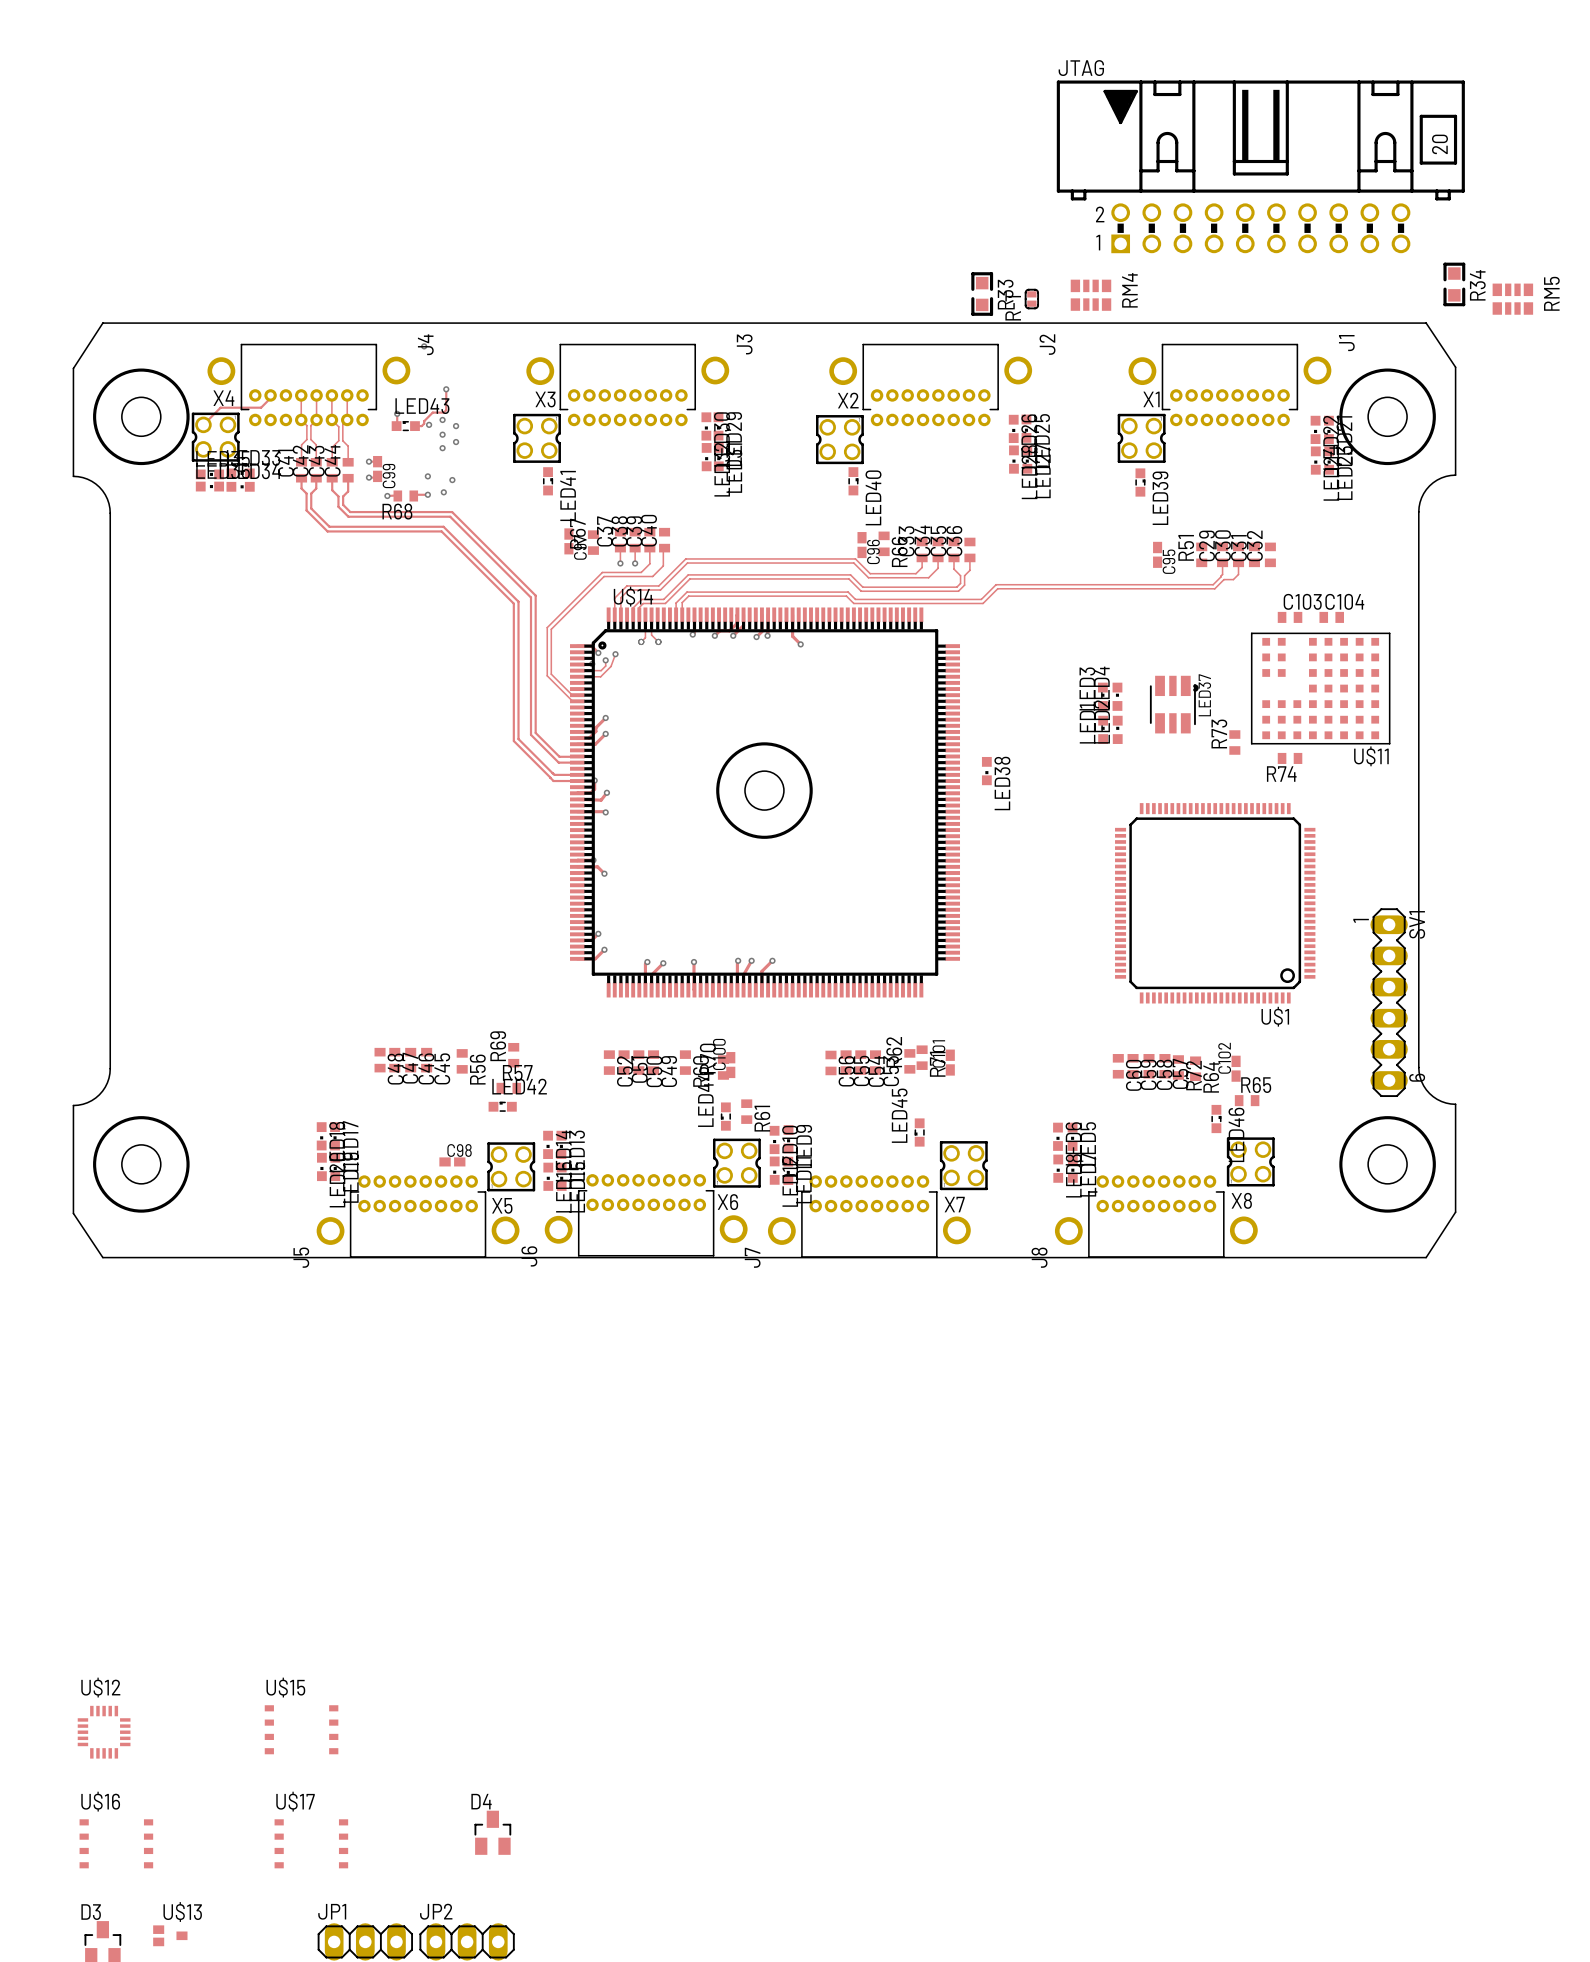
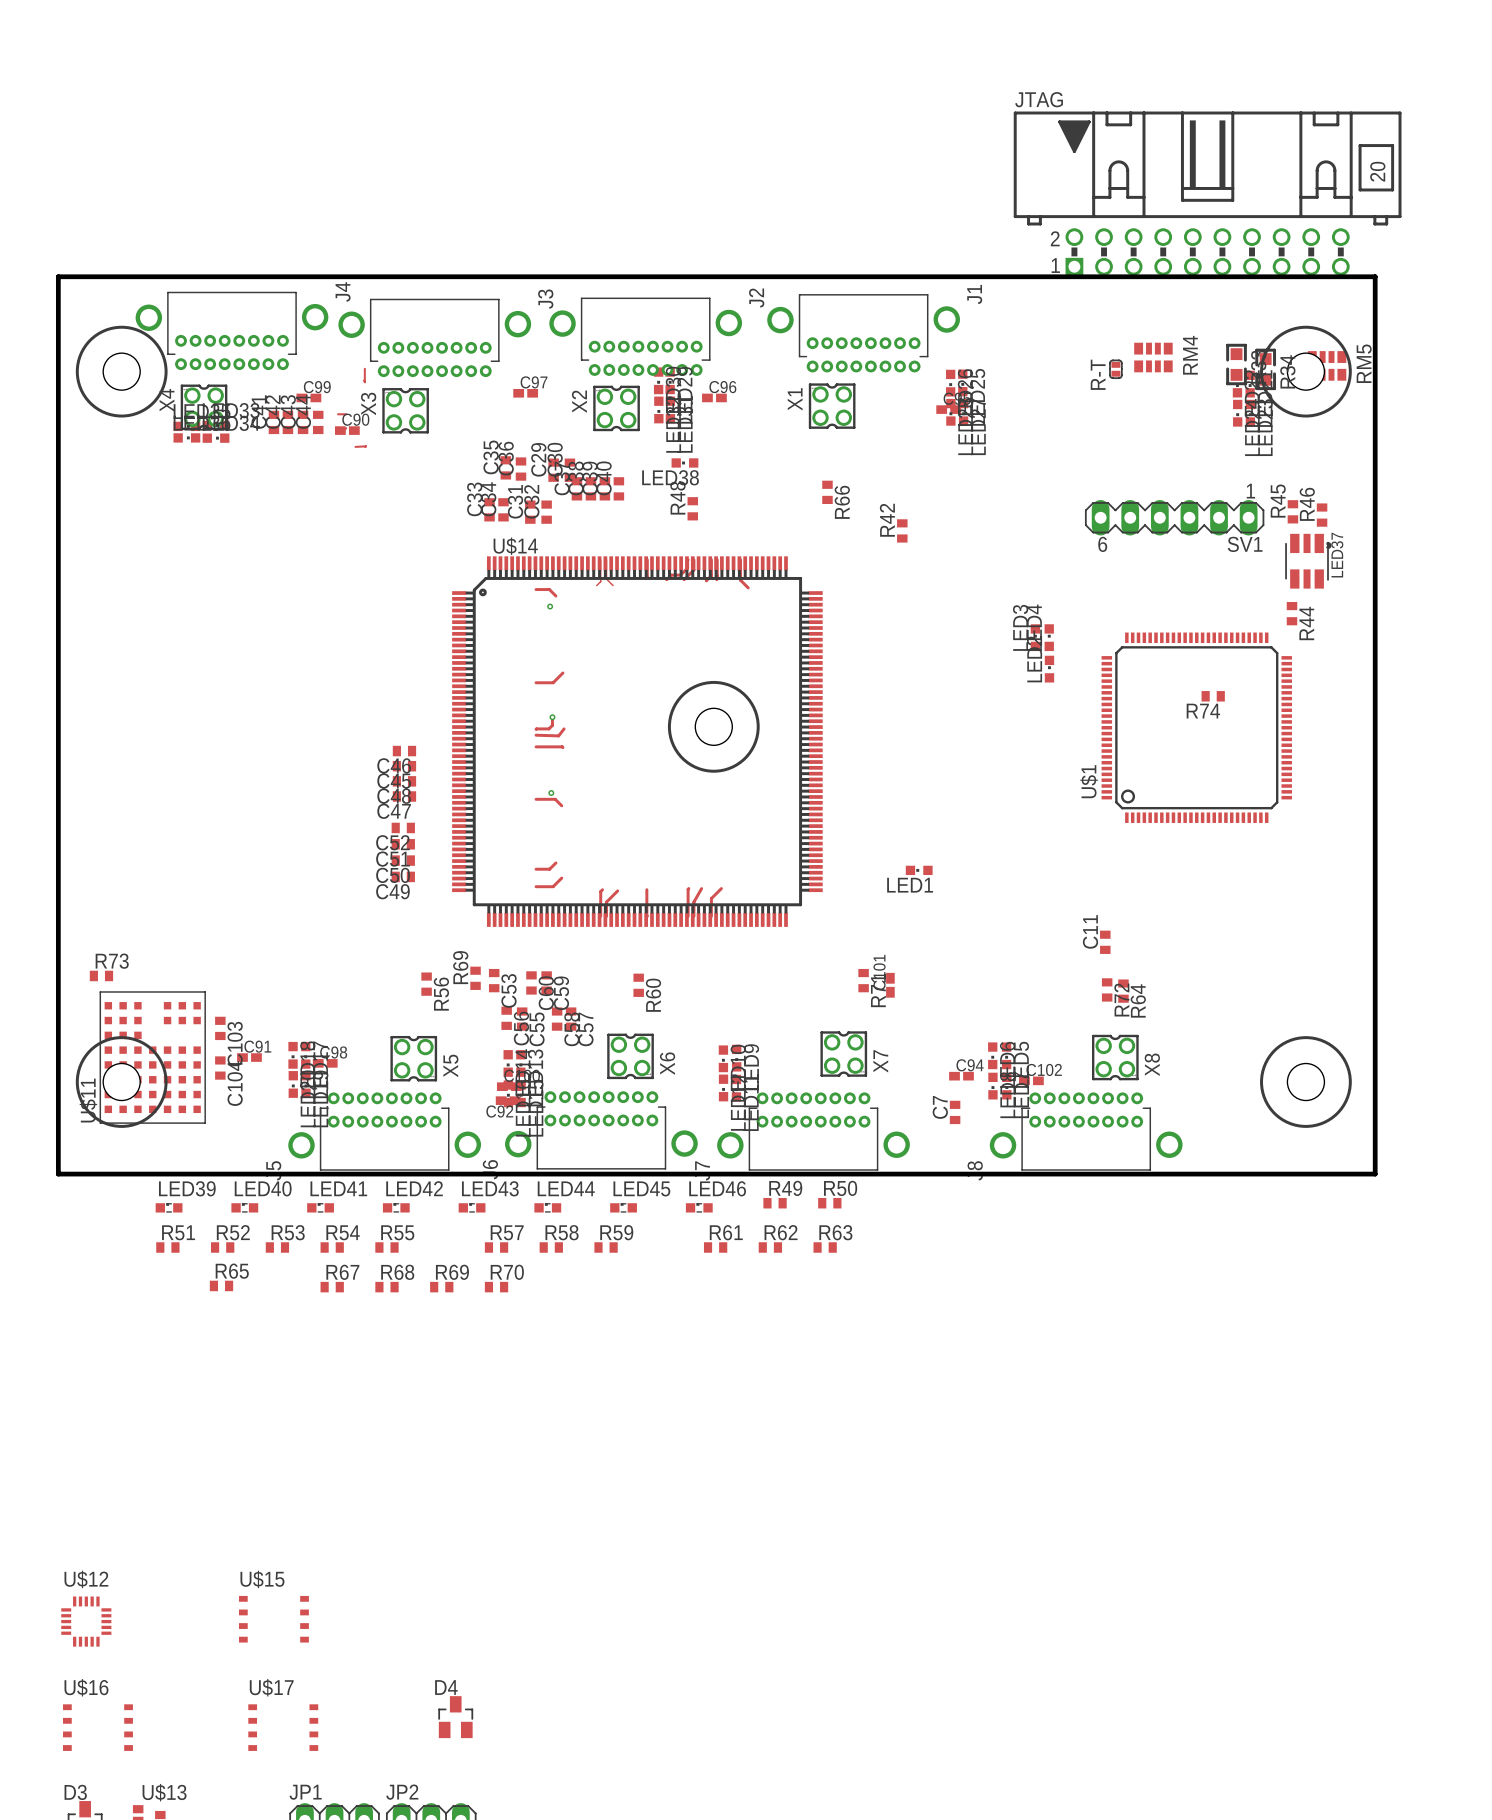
JTAG position: (1260, 166) -> (1207, 193)
R34 position: (1454, 284) -> (1265, 369)
R33 position: (982, 294) -> (1236, 364)
RM4 position: (1090, 295) -> (1153, 357)
R-T position: (1031, 299) -> (1115, 369)
RM5 position: (1512, 299) -> (1327, 365)
board edge: (102, 323) (1426, 323) (1455, 367) (1455, 475) (1441, 477) (1429, 485) (1421, 497) (1418, 511) (1418, 1067) (1421, 1081) (1429, 1093) (1441, 1101) (1455, 1104) (1455, 1212) (1426, 1257) (102, 1257) (73, 1213) (73, 1105) (87, 1102) (99, 1094) (107, 1082) (110, 1068) (110, 513) (107, 499) (99, 487) (87, 479) (73, 476) (73, 368) (102, 323) -> (58, 276) (58, 1174) (1375, 1174) (1375, 276) (58, 276)
via: (424, 346) -> none
J4 position: (308, 384) -> (231, 330)
J3 position: (627, 384) -> (434, 337)
J2 position: (930, 384) -> (645, 336)
J1 position: (1229, 384) -> (863, 333)
track: (446, 389) (446, 410) (443, 412) (432, 412) (421, 426) (414, 426) -> none
via: (446, 389) -> none
track: (270, 395) (270, 398) (261, 407) (220, 407) (203, 424) -> none
track: (301, 395) (301, 419) (306, 425) (306, 439) (301, 444) (301, 462) (302, 461) -> none
track: (316, 395) (316, 419) (310, 425) (310, 439) (316, 444) (316, 462) -> none
track: (331, 395) (331, 419) (338, 426) (338, 440) (332, 447) (332, 462) -> none
track: (347, 395) (347, 419) (342, 424) (342, 440) (348, 446) (348, 462) -> none
X4 name position: X4 (223, 398) -> X4 (167, 400)
X3 name position: X3 (545, 399) -> X3 (368, 403)
X1 name position: X1 (1151, 399) -> X1 (795, 399)
X2 name position: X2 (848, 400) -> X2 (579, 401)
X4 footprint: [191, 412, 240, 462] -> [180, 384, 228, 431]
via: (397, 413) -> none
X3 footprint: [513, 413, 561, 463] -> [382, 388, 429, 434]
X1 footprint: [1117, 413, 1166, 463] -> [808, 383, 856, 429]
X2 footprint: [816, 415, 864, 465] -> [593, 385, 640, 432]
via: (442, 419) -> none
via: (429, 424) -> none
LED43 position: (405, 426) -> (472, 1207)
via: (456, 426) -> none
via: (442, 434) -> none
via: (456, 442) -> none
via: (442, 448) -> none
via: (369, 461) -> none
C99 rotation: 0° (377, 469) -> 90° clockwise (308, 397)
C99 position: (377, 469) -> (308, 397)
via: (427, 476) -> none
via: (369, 477) -> none
track: (301, 478) (301, 488) (306, 493) (306, 510) (327, 531) (441, 531) (513, 603) (513, 741) (553, 781) (577, 781) -> none
track: (316, 478) (316, 488) (311, 493) (311, 508) (329, 526) (443, 526) (518, 601) (518, 739) (554, 774) (577, 774) -> none
track: (332, 478) (332, 490) (338, 496) (338, 506) (348, 516) (450, 516) (531, 597) (531, 734) (558, 762) (577, 762) -> none
track: (348, 478) (348, 491) (343, 496) (343, 504) (350, 512) (452, 512) (535, 595) (535, 732) (559, 756) (577, 756) -> none
C90: none -> (347, 430)
via: (452, 480) -> none
LED41 rotation: 0° (548, 481) -> 90° counterclockwise (320, 1207)
LED41 position: (548, 481) -> (320, 1207)
LED40 rotation: 0° (853, 481) -> 90° counterclockwise (244, 1207)
LED40 position: (853, 481) -> (244, 1207)
LED39 rotation: 0° (1140, 482) -> 90° counterclockwise (169, 1207)
LED39 position: (1140, 482) -> (169, 1207)
via: (443, 492) -> none
track: (427, 494) (413, 496) -> none
via: (427, 494) -> none
via: (387, 496) -> none
R68 position: (405, 496) -> (386, 1287)
R68 name position: R68 (397, 511) -> R68 (397, 1272)
C97 rotation: 0° (568, 541) -> 90° clockwise (525, 393)
C97 position: (568, 541) -> (525, 393)
R67 rotation: 0° (593, 542) -> 90° clockwise (332, 1287)
R67 position: (593, 542) -> (332, 1287)
C96 rotation: 0° (862, 545) -> 90° clockwise (714, 397)
C96 position: (862, 545) -> (714, 397)
track: (620, 548) (620, 563) -> none
track: (635, 548) (635, 563) -> none
track: (649, 548) (649, 563) (641, 572) (602, 572) (547, 627) (547, 675) (572, 701) (577, 701) -> none
track: (664, 548) (663, 565) (652, 576) (604, 576) (551, 629) (551, 674) (572, 695) (577, 695) -> none
C33 position: (922, 549) -> (489, 509)
C34 position: (938, 549) -> (503, 509)
C35 position: (953, 549) -> (505, 467)
C36 position: (969, 549) -> (520, 469)
C95 rotation: 0° (1157, 554) -> 90° clockwise (948, 409)
C95 position: (1157, 554) -> (948, 409)
R51 rotation: 0° (1201, 554) -> 90° clockwise (167, 1247)
R51 position: (1201, 554) -> (167, 1247)
C29 position: (1222, 554) -> (553, 470)
C30 position: (1238, 554) -> (569, 470)
C31 position: (1254, 554) -> (530, 512)
C32 position: (1270, 554) -> (546, 512)
track: (922, 557) (922, 567) (915, 573) (870, 573) (855, 558) (685, 558) (658, 585) (626, 585) (614, 598) (614, 614) -> none
track: (938, 557) (938, 568) (928, 577) (868, 577) (853, 563) (687, 563) (660, 590) (628, 590) (620, 597) (620, 614) -> none
track: (953, 557) (953, 569) (960, 575) (960, 583) (956, 587) (862, 587) (850, 574) (688, 574) (663, 599) (641, 599) (633, 607) (633, 614) -> none
track: (969, 557) (969, 570) (964, 575) (964, 585) (958, 591) (861, 591) (848, 578) (689, 578) (665, 603) (643, 603) (639, 607) (639, 614) -> none
R48: none -> (692, 508)
track: (1222, 562) (1222, 574) (1213, 584) (996, 584) (981, 599) (855, 599) (848, 592) (687, 592) (676, 603) (676, 614) -> none
track: (1238, 562) (1238, 574) (1233, 579) (1224, 579) (1214, 588) (997, 588) (983, 603) (853, 603) (846, 596) (688, 596) (682, 602) (682, 614) -> none
via: (620, 563) -> none
via: (635, 563) -> none
R45: none -> (1292, 511)
R46: none -> (1322, 515)
R42: none -> (902, 530)
C103 rotation: 0° (1290, 617) -> 90° clockwise (220, 1028)
C103 position: (1290, 617) -> (220, 1028)
C104 rotation: 0° (1331, 617) -> 90° clockwise (220, 1068)
C104 position: (1331, 617) -> (220, 1068)
via: (692, 634) -> none
via: (714, 635) -> none
via: (733, 635) -> none
via: (767, 635) -> none
via: (756, 637) -> none
via: (641, 641) -> none
via: (658, 641) -> none
via: (800, 644) -> none
via: (598, 652) -> none
track: (615, 654) (611, 666) (600, 676) (577, 676) -> none
via: (615, 654) -> none
track: (605, 660) (605, 666) (601, 670) (577, 670) -> none
via: (605, 660) -> none
R44: none -> (1291, 613)
U$11 rotation: 0° (1320, 688) -> 90° clockwise (152, 1057)
U$11 position: (1320, 688) -> (152, 1057)
LED37 position: (1174, 704) -> (1308, 561)
track: (605, 717) (589, 738) (577, 738) -> none
via: (605, 717) -> none
LED1 rotation: 0° (1103, 729) -> 90° counterclockwise (919, 870)
LED1 position: (1103, 729) -> (919, 870)
via: (605, 733) -> none
R73 rotation: 0° (1234, 742) -> 90° clockwise (101, 975)
R73 position: (1234, 742) -> (101, 975)
LED38 rotation: 0° (986, 771) -> 90° clockwise (684, 462)
LED38 position: (986, 771) -> (684, 462)
via: (606, 792) -> none
U$14 position: (765, 802) -> (637, 741)
via: (605, 812) -> none
via: (604, 873) -> none
U$1 rotation: 0° (1215, 903) -> 90° clockwise (1196, 727)
U$1 position: (1215, 903) -> (1196, 727)
via: (598, 933) -> none
via: (604, 949) -> none
via: (738, 960) -> none
via: (751, 960) -> none
via: (772, 960) -> none
via: (647, 962) -> none
via: (694, 962) -> none
via: (663, 963) -> none
SV1 rotation: 0° (1389, 1002) -> 90° clockwise (1174, 517)
SV1 position: (1389, 1002) -> (1174, 517)
C11: none -> (1105, 942)
C48 rotation: 0° (380, 1060) -> 90° clockwise (404, 781)
C48 position: (380, 1060) -> (404, 781)
C47 rotation: 0° (394, 1060) -> 90° clockwise (404, 796)
C47 position: (394, 1060) -> (404, 796)
C46 rotation: 0° (410, 1060) -> 90° clockwise (404, 751)
C46 position: (410, 1060) -> (404, 751)
C45 rotation: 0° (426, 1060) -> 90° clockwise (404, 766)
C45 position: (426, 1060) -> (404, 766)
R62 rotation: 0° (909, 1061) -> 90° clockwise (770, 1247)
R62 position: (909, 1061) -> (770, 1247)
C52 rotation: 0° (609, 1062) -> 90° clockwise (403, 827)
C52 position: (609, 1062) -> (403, 827)
C51 rotation: 0° (624, 1062) -> 90° clockwise (403, 844)
C51 position: (624, 1062) -> (403, 844)
C50 rotation: 0° (638, 1062) -> 90° clockwise (403, 860)
C50 position: (638, 1062) -> (403, 860)
C49 rotation: 0° (653, 1062) -> 90° clockwise (403, 876)
C49 position: (653, 1062) -> (403, 876)
C56 position: (830, 1062) -> (506, 1018)
C55 position: (846, 1062) -> (522, 1019)
C54: (860, 1062) -> none
C53 position: (875, 1062) -> (494, 980)
C100 rotation: 0° (730, 1065) -> 90° clockwise (509, 1086)
C100 position: (730, 1065) -> (509, 1086)
C60 position: (1118, 1066) -> (531, 982)
C59 position: (1133, 1066) -> (546, 982)
C58 position: (1148, 1066) -> (557, 1019)
C57 position: (1164, 1066) -> (571, 1019)
R70 rotation: 0° (723, 1067) -> 90° clockwise (496, 1287)
R70 position: (723, 1067) -> (496, 1287)
C102 rotation: 0° (1236, 1068) -> 90° clockwise (1031, 1080)
C102 position: (1236, 1068) -> (1031, 1080)
R57 position: (508, 1088) -> (496, 1247)
R65 position: (1247, 1100) -> (221, 1285)
LED42 position: (502, 1106) -> (396, 1207)
R61 rotation: 0° (746, 1111) -> 90° clockwise (715, 1247)
R61 position: (746, 1111) -> (715, 1247)
LED44 rotation: 0° (725, 1116) -> 90° clockwise (547, 1207)
LED44 position: (725, 1116) -> (547, 1207)
R61 name position: R61 (762, 1118) -> R61 (726, 1232)
LED46 rotation: 0° (1216, 1119) -> 90° counterclockwise (699, 1207)
LED46 position: (1216, 1119) -> (699, 1207)
LED45 rotation: 0° (919, 1132) -> 90° clockwise (623, 1207)
LED45 position: (919, 1132) -> (623, 1207)
X8 footprint: [1226, 1137, 1275, 1187] -> [1092, 1034, 1139, 1081]
C91: none -> (249, 1057)
X6 footprint: [712, 1138, 761, 1188] -> [607, 1033, 654, 1080]
X7 footprint: [939, 1141, 988, 1191] -> [820, 1031, 868, 1077]
X5 footprint: [487, 1142, 536, 1192] -> [390, 1035, 438, 1082]
C94: none -> (961, 1076)
C98 position: (452, 1161) -> (325, 1063)
C92: none -> (508, 1100)
C7: none -> (955, 1112)
X8 name position: X8 (1241, 1200) -> X8 (1152, 1064)
X6 name position: X6 (727, 1202) -> X6 (667, 1063)
X7 name position: X7 (954, 1204) -> X7 (880, 1061)
X5 name position: X5 (502, 1205) -> X5 (450, 1065)
R49: none -> (775, 1203)
R50: none -> (829, 1203)
R52: none -> (222, 1247)
R53: none -> (277, 1247)
R54: none -> (332, 1247)
R55: none -> (386, 1247)
R58: none -> (551, 1247)
R59: none -> (606, 1247)
R63: none -> (825, 1247)
R69: none -> (441, 1287)

